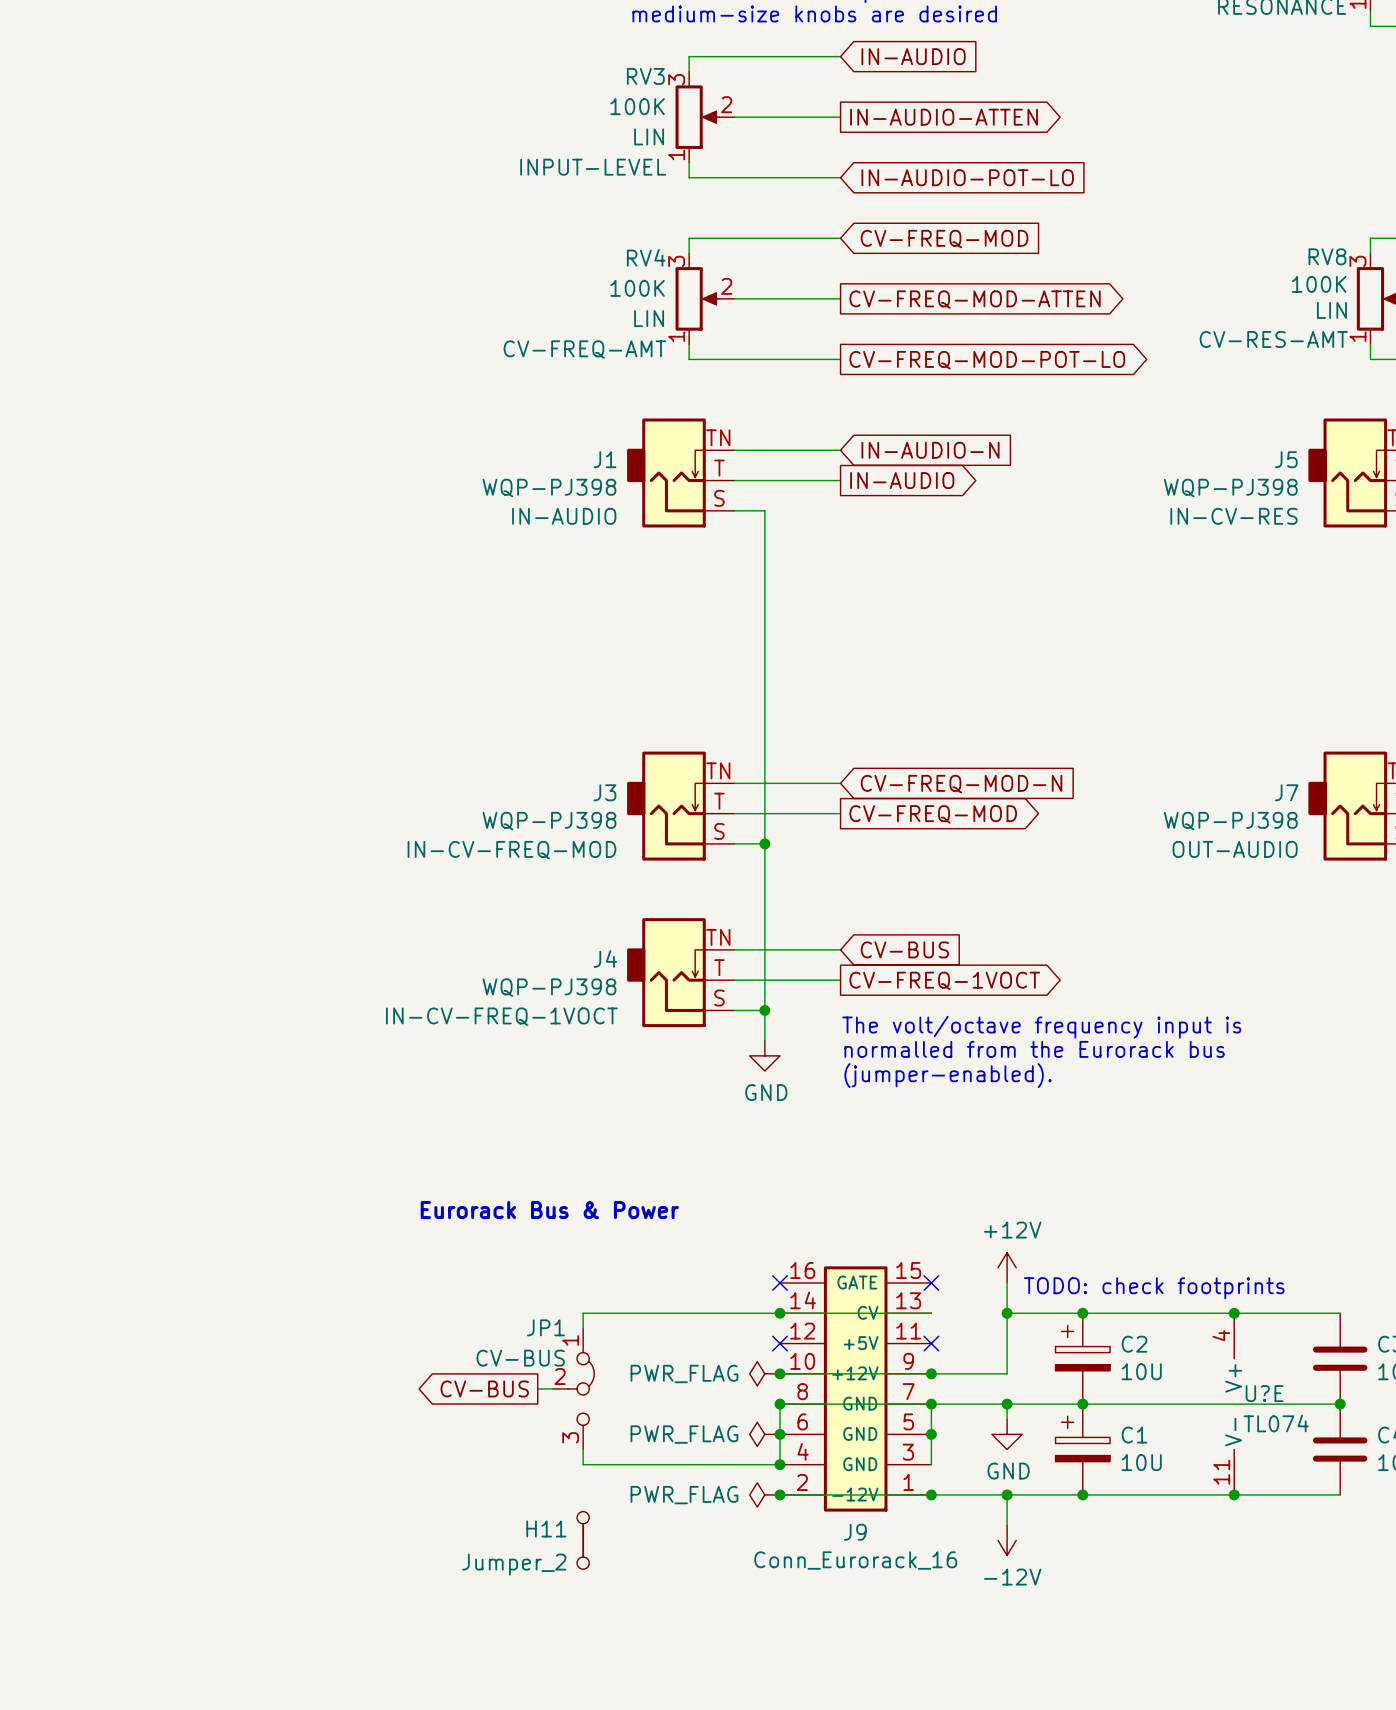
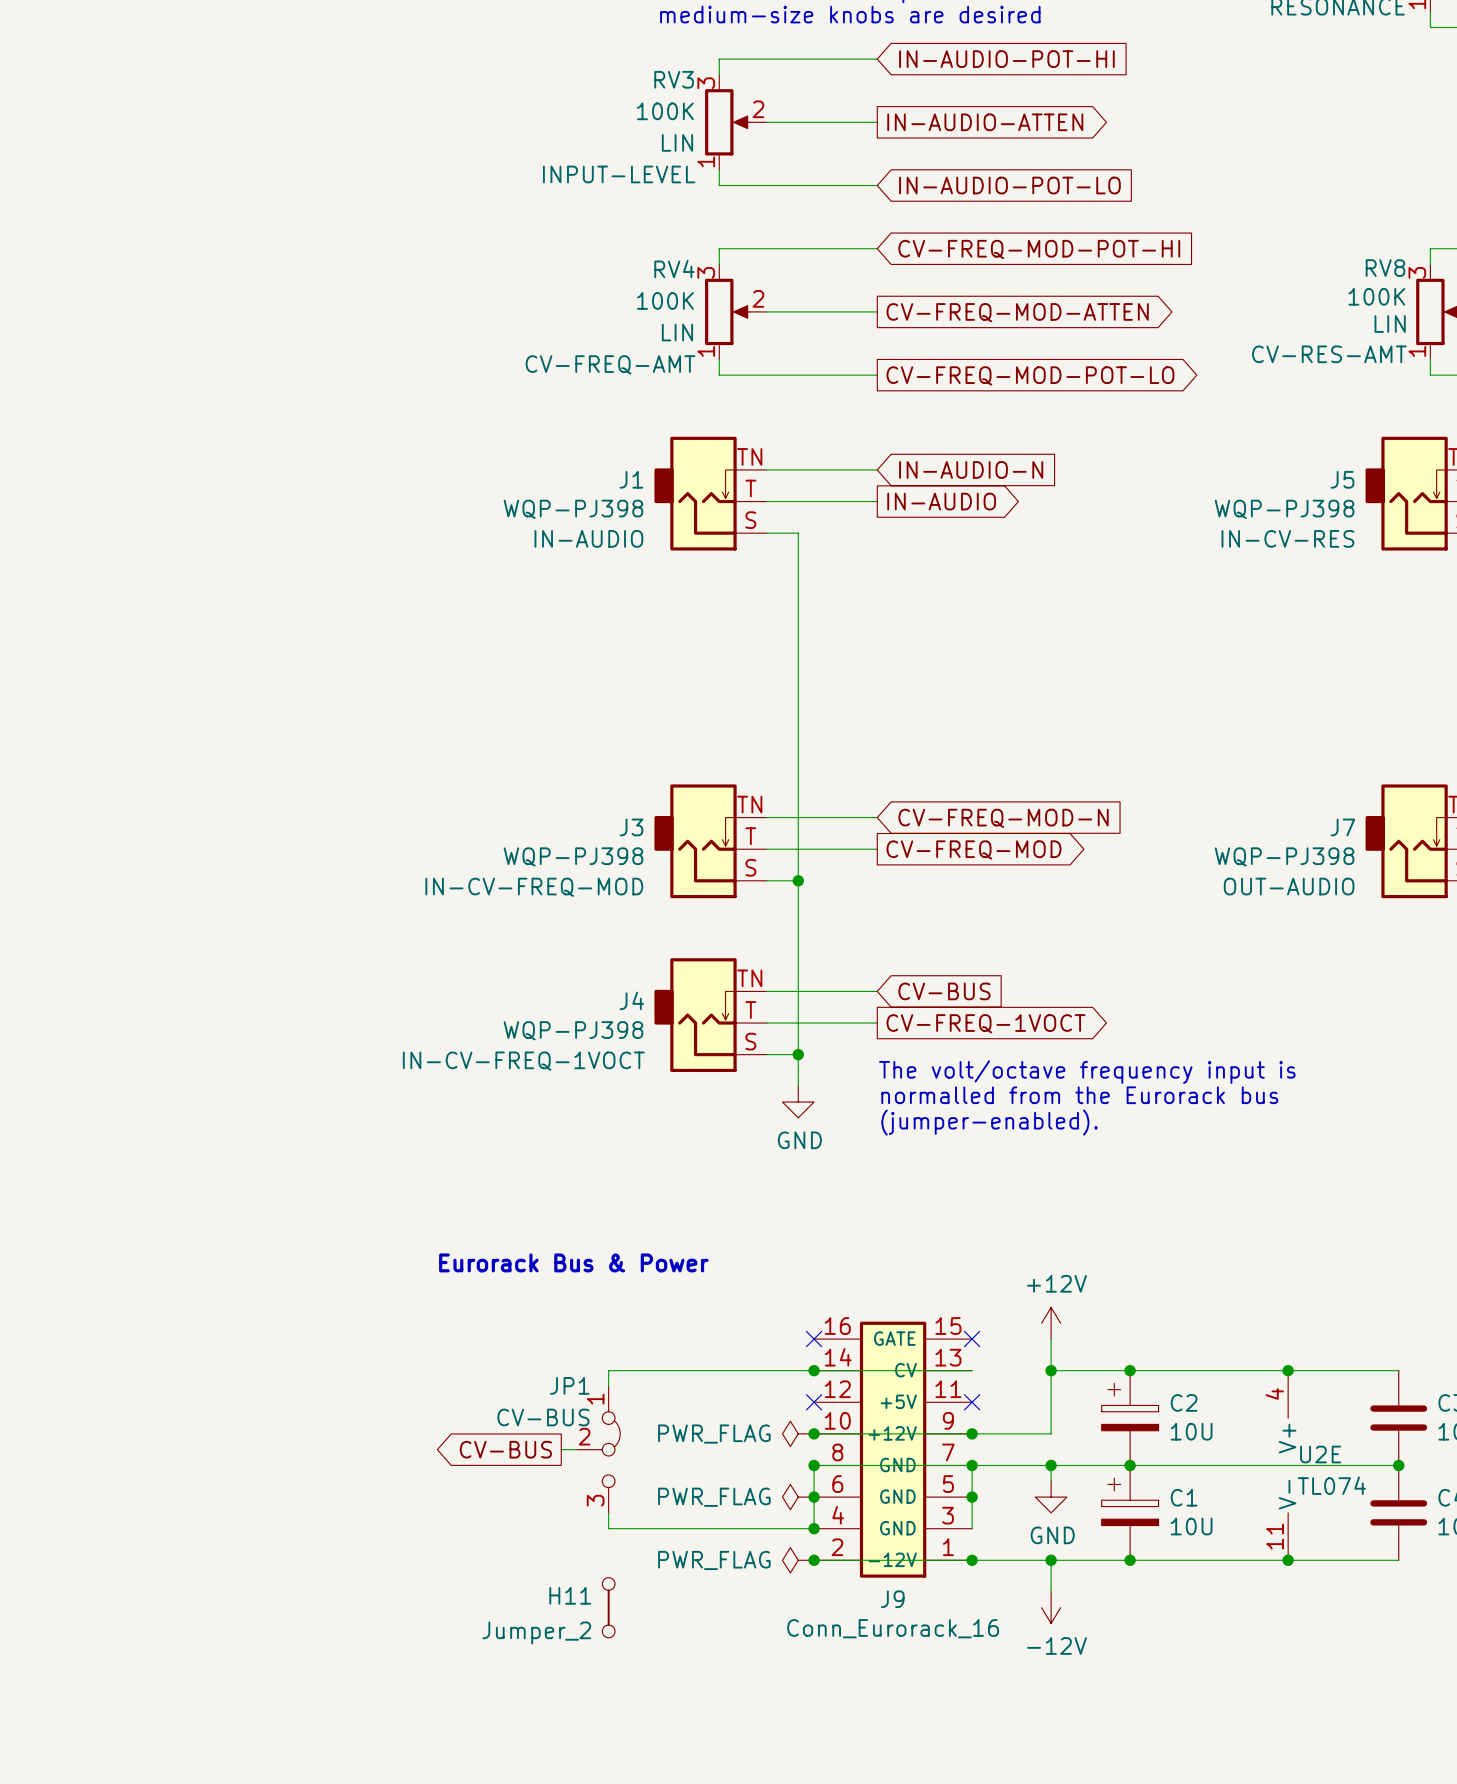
global label: IN-AUDIO (913, 56) -> IN-AUDIO-POT-HI (1006, 59)
global label: CV-FREQ-MOD (944, 239) -> CV-FREQ-MOD-POT-HI (1039, 249)
text: TODO: check footprints (1154, 1288) -> none
U?E name: U?E (1264, 1393) -> U2E (1320, 1454)

